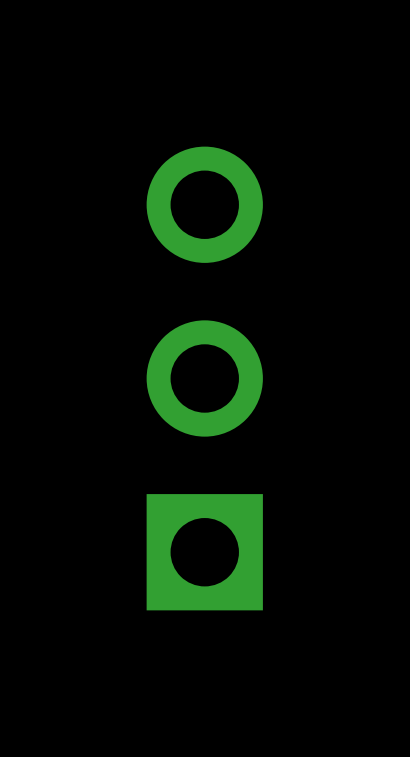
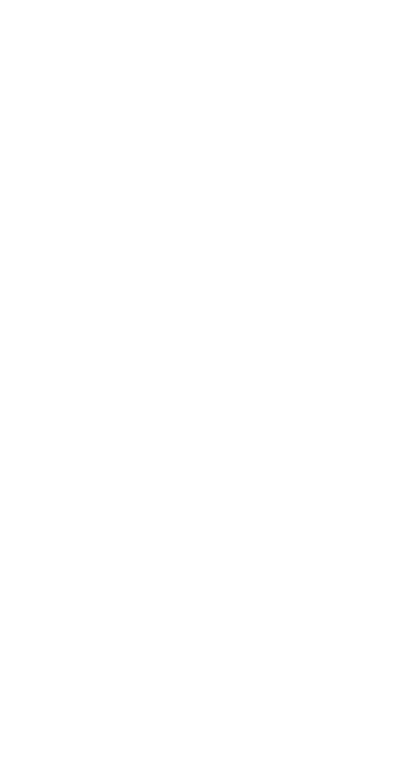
part: (204, 378) -> none

